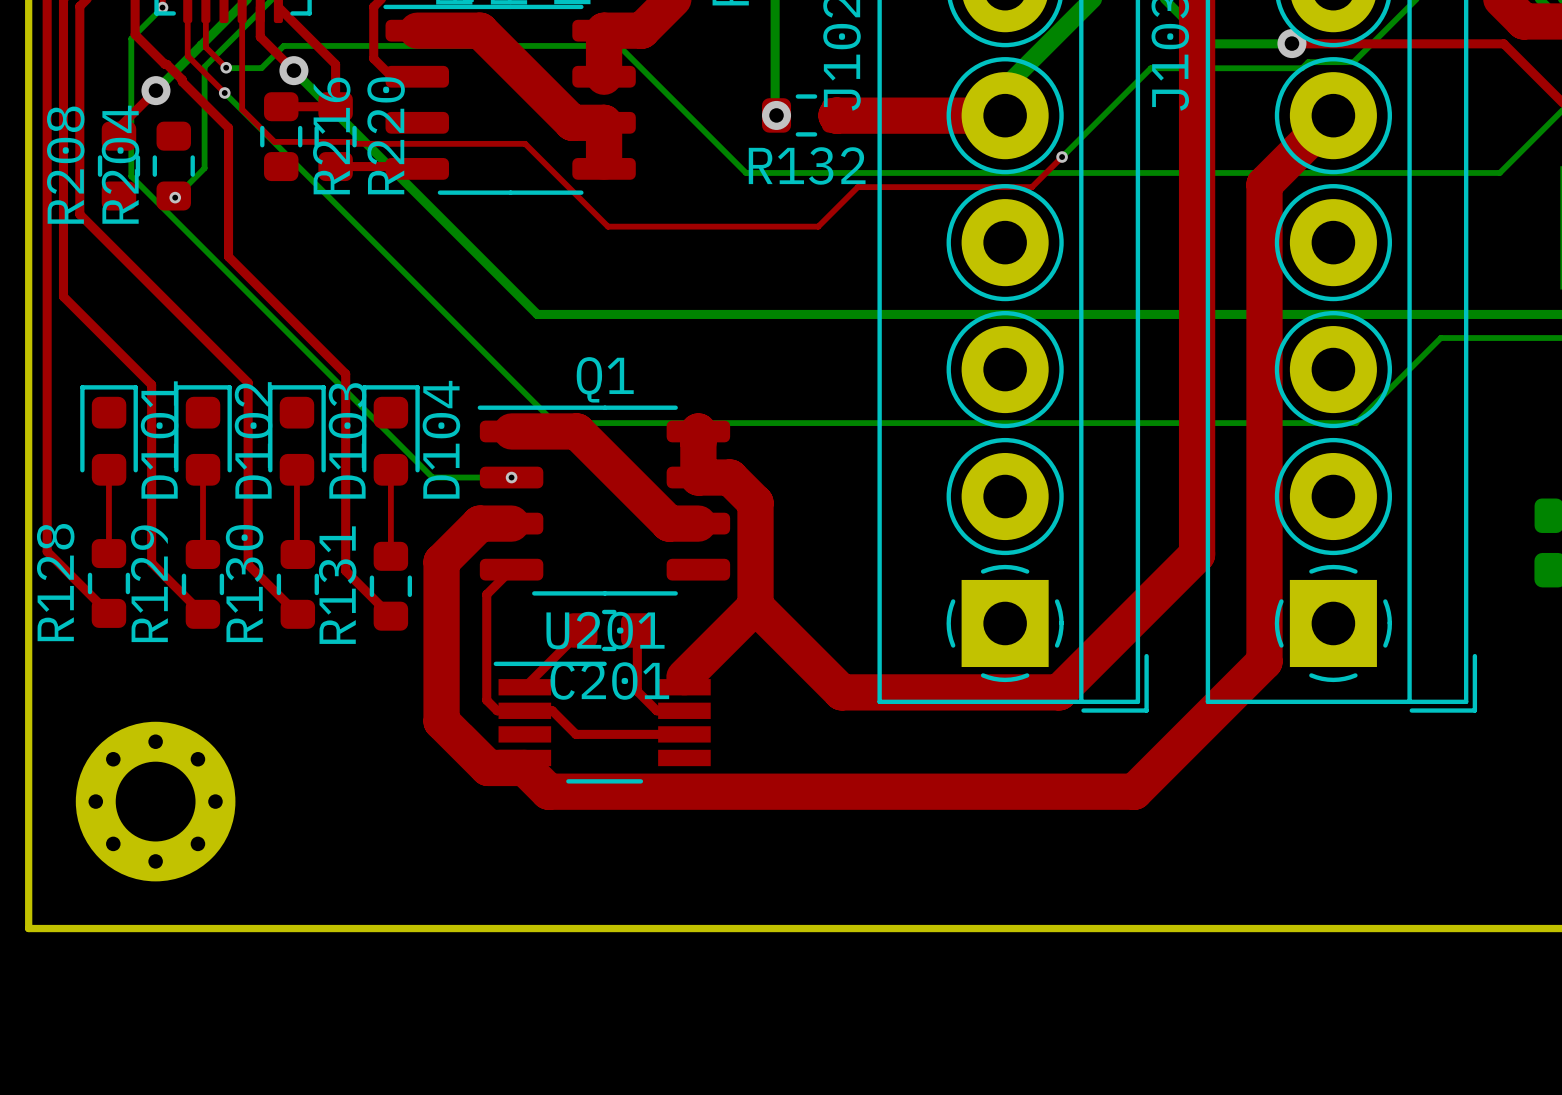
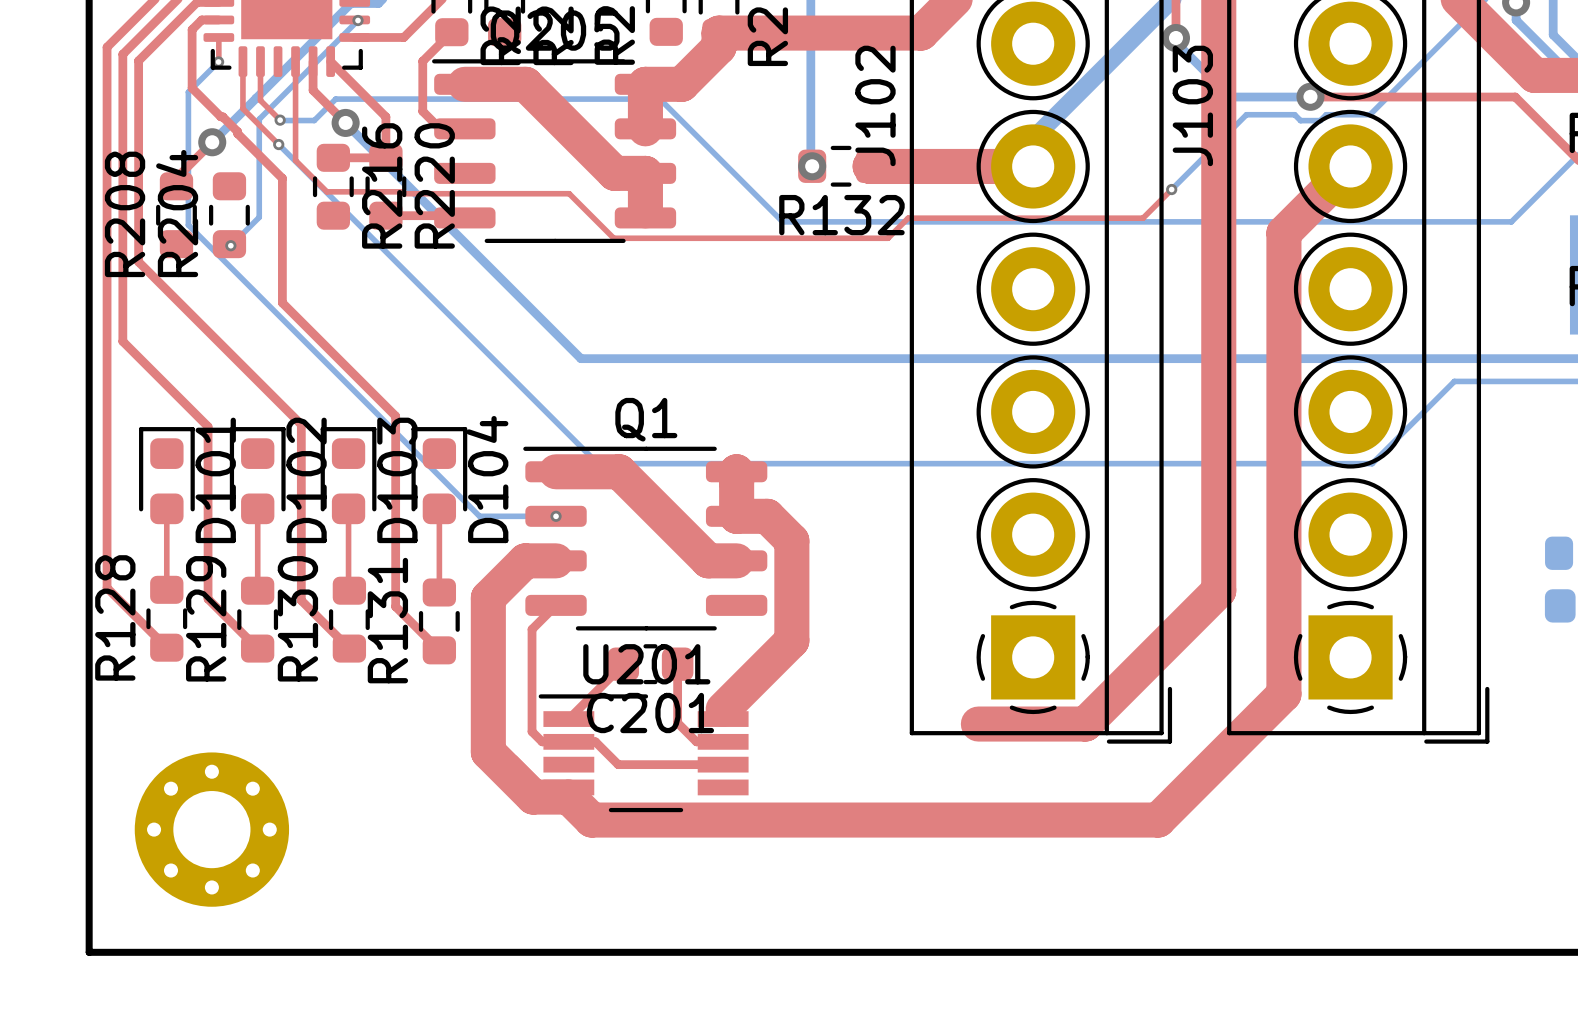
bottom track: (1281, 68) (1150, 68) (1062, 157) -> (1300, 120) (1294, 114) (1246, 114) (1171, 189)
top track: (1062, 157) (1031, 187) (857, 187) -> (1171, 189) (1143, 218) (908, 218) (890, 235)
via position: (1062, 157) -> (1171, 189)
top track: (571, 189) (608, 226) (818, 226) (855, 189) -> (613, 238) (888, 238)
top track: (755, 606) (841, 692) (948, 692) -> none

